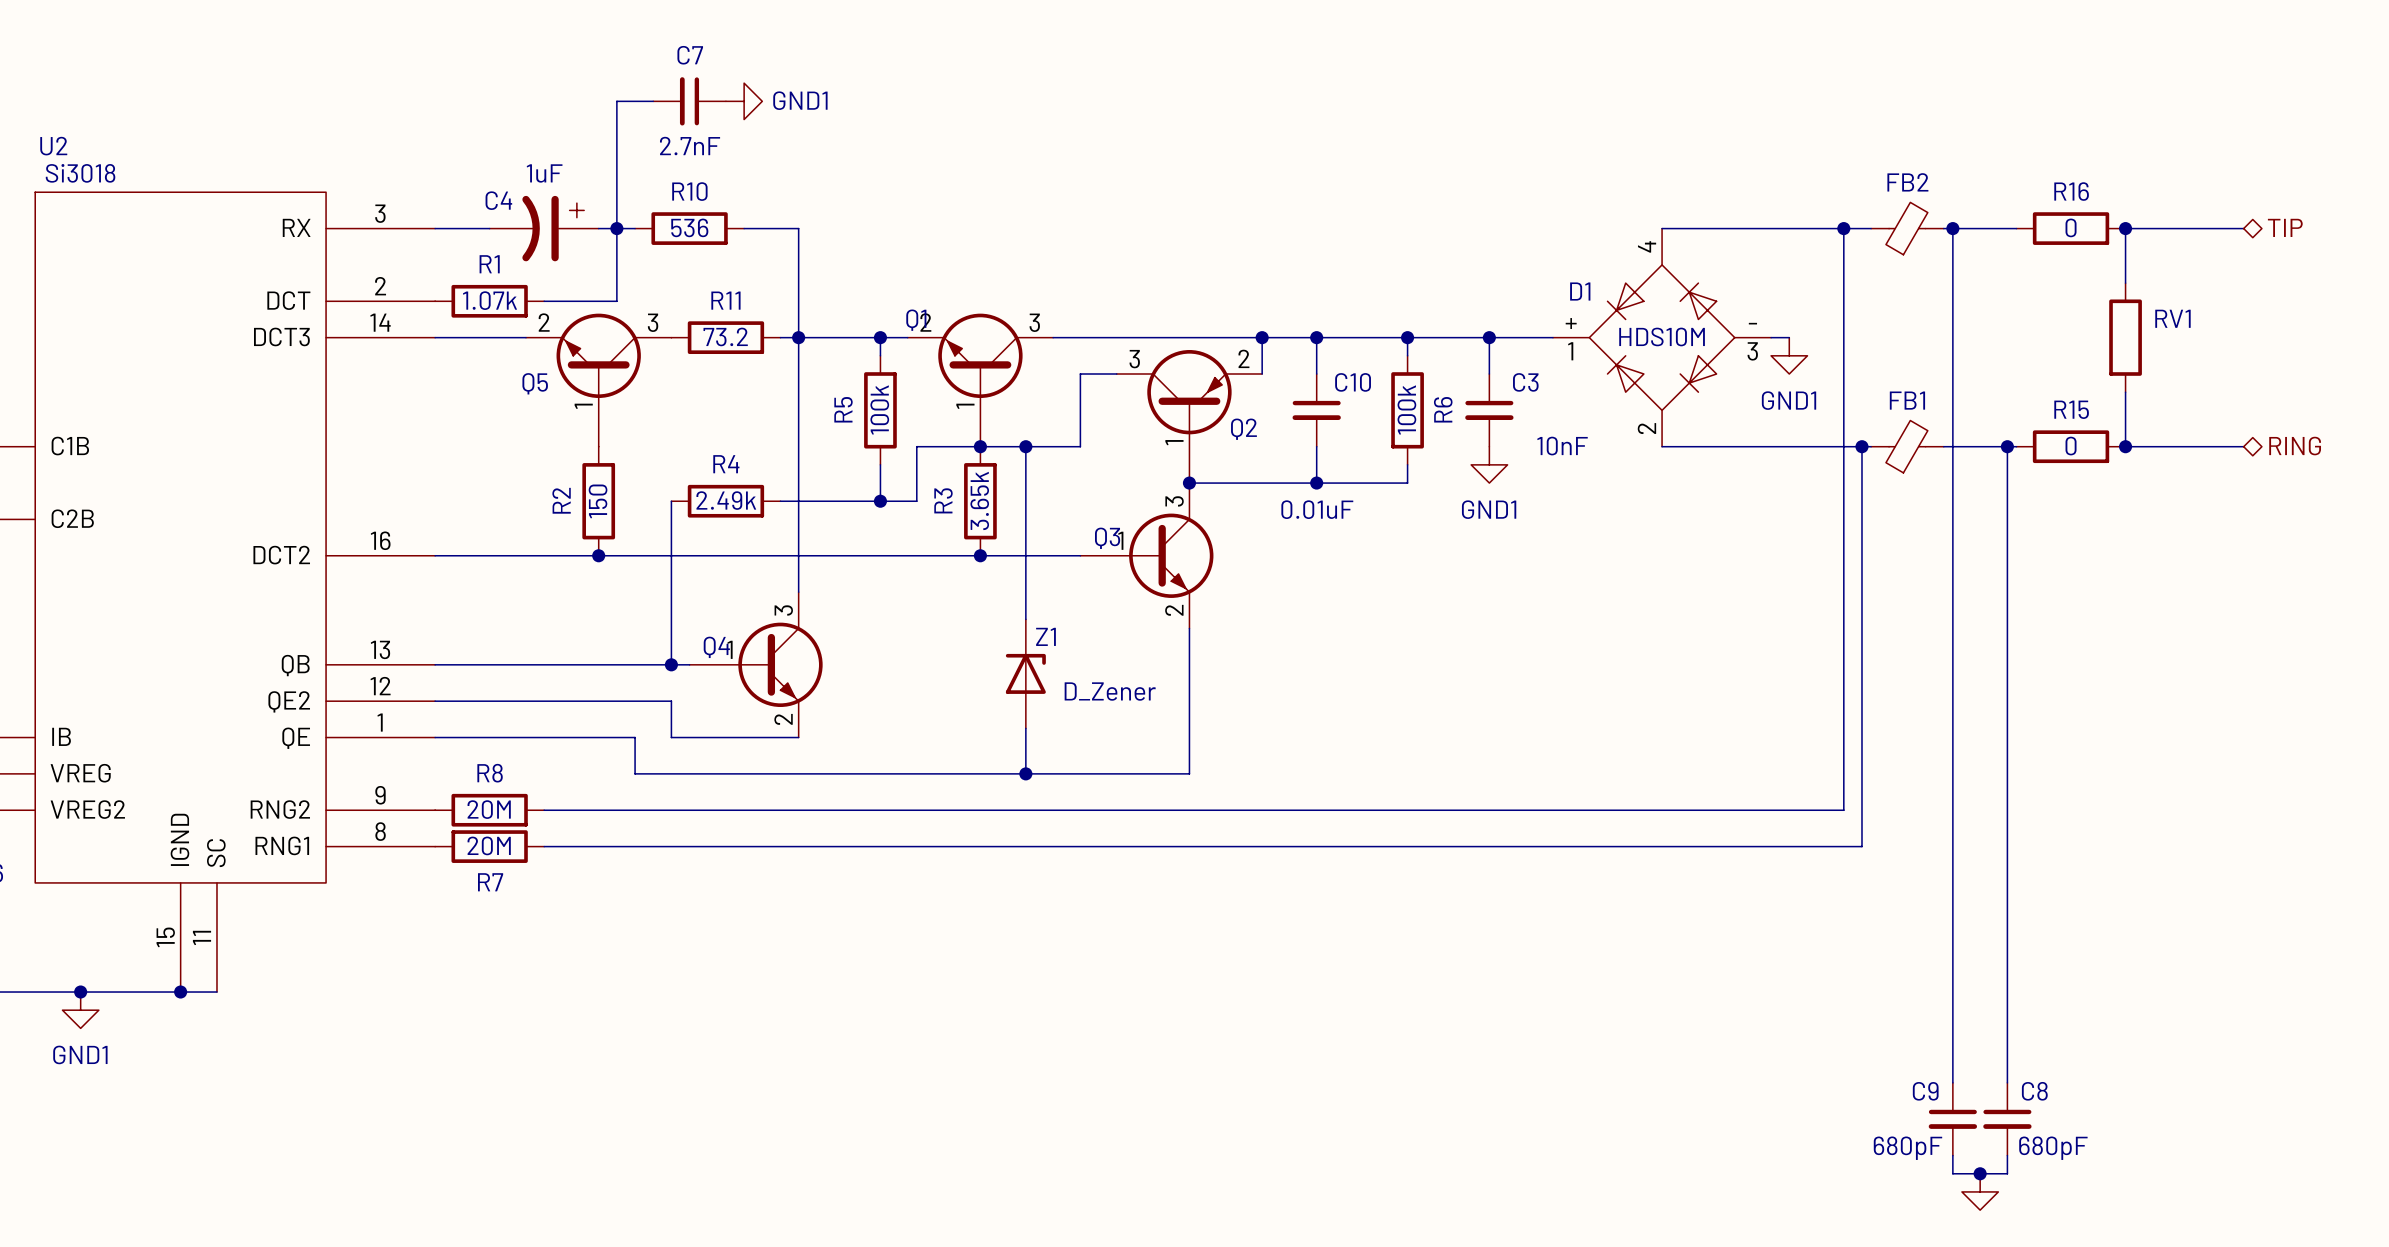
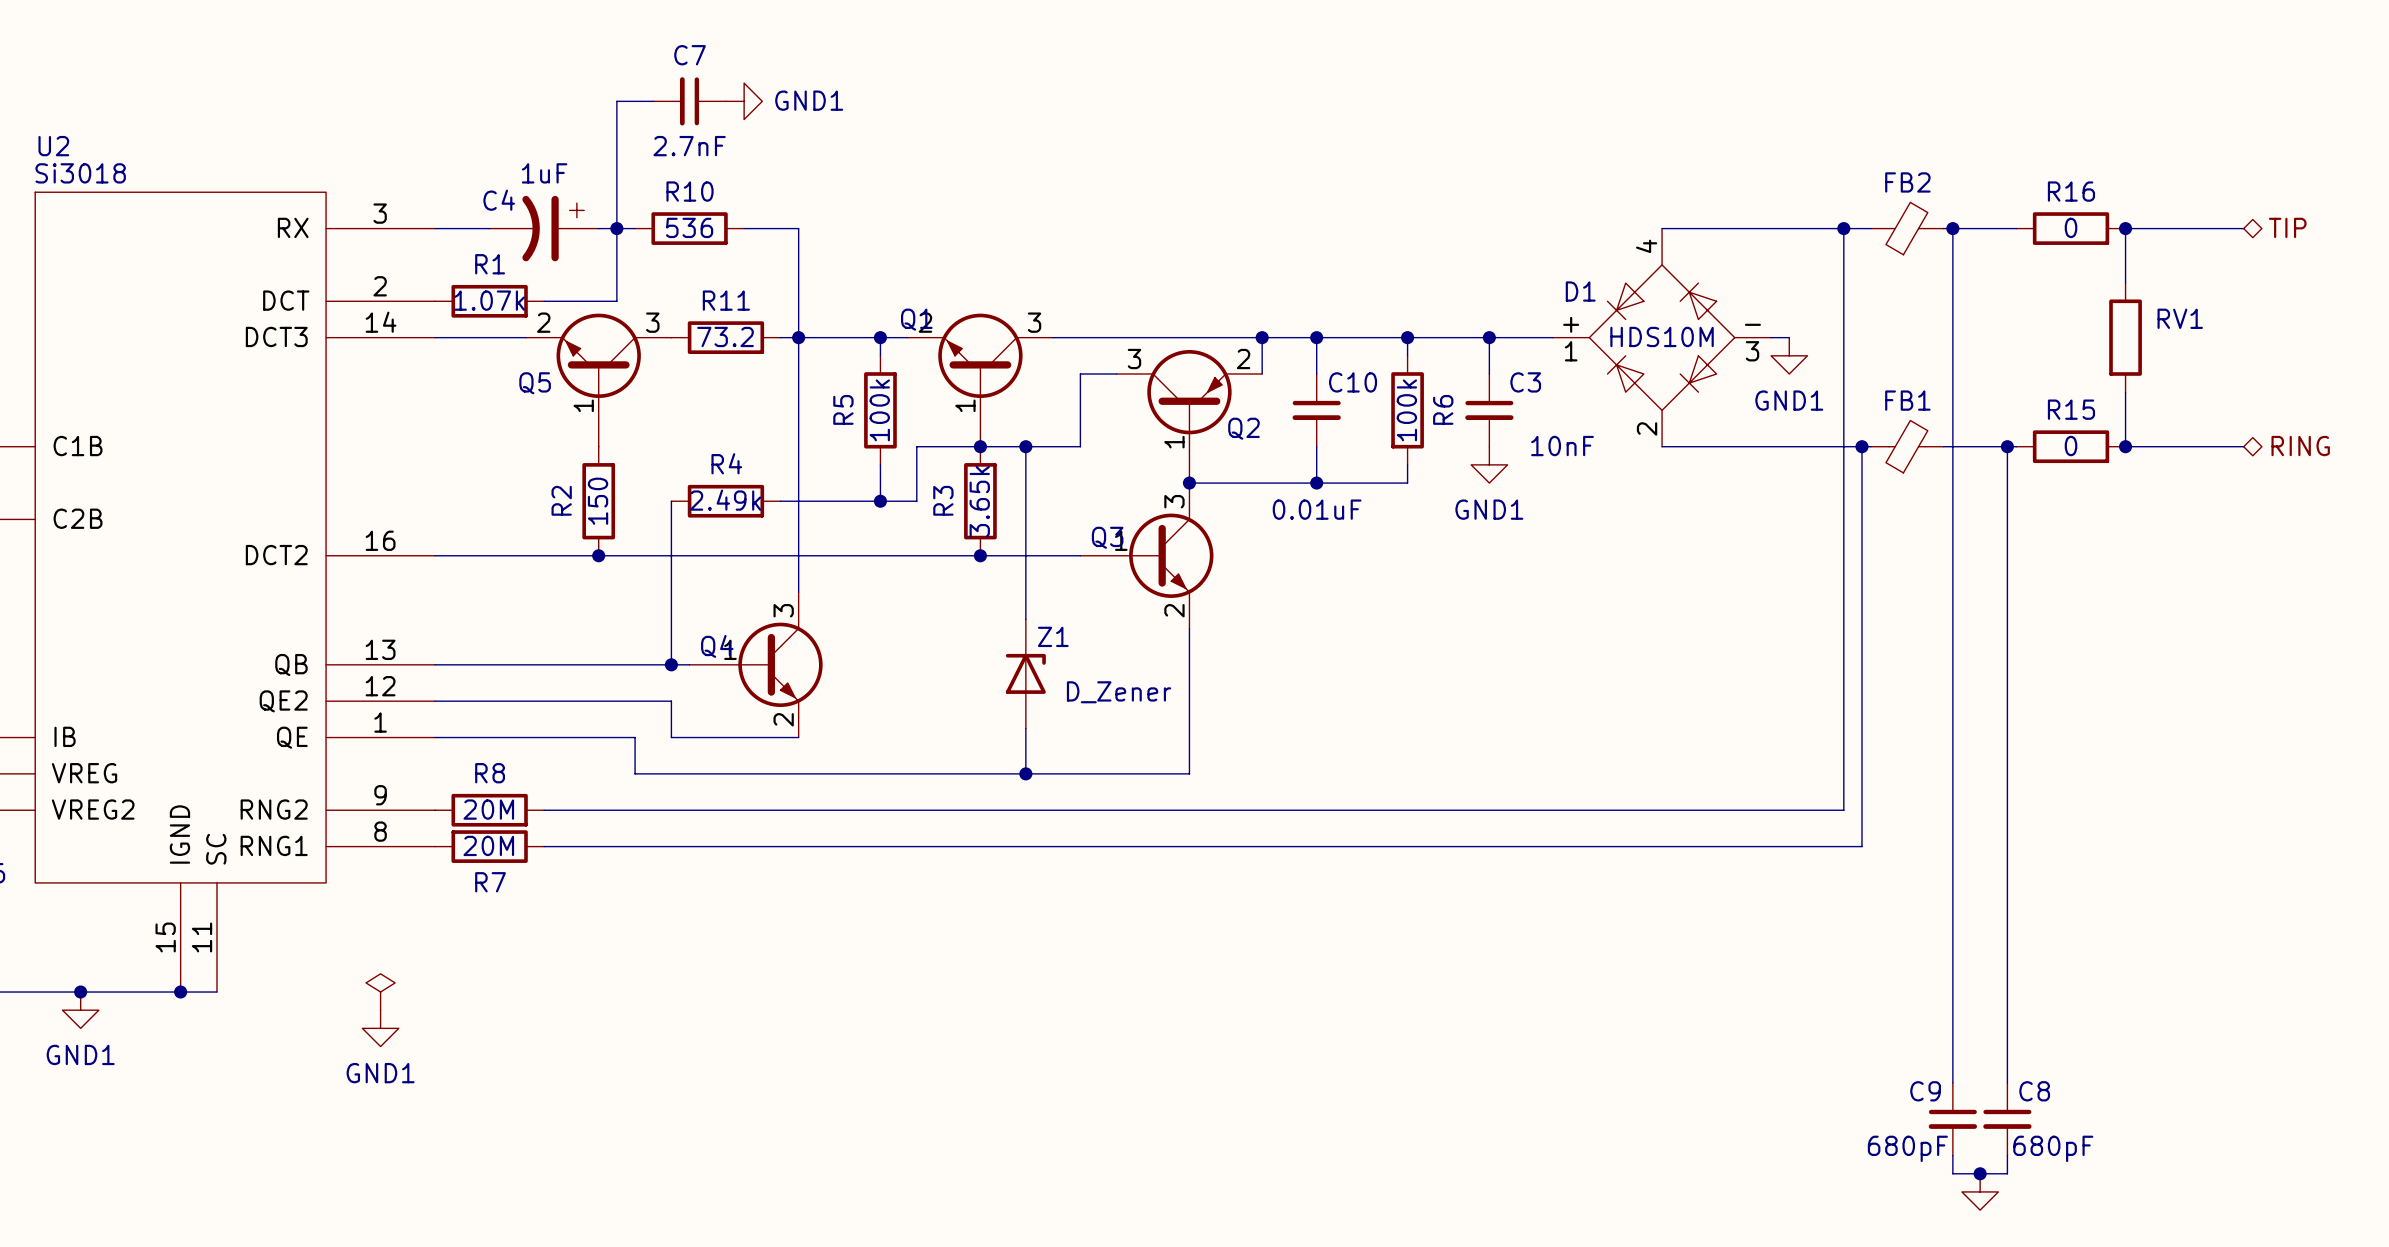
power symbol: none -> (380, 992)
power symbol: none -> GND1 (380, 1028)

